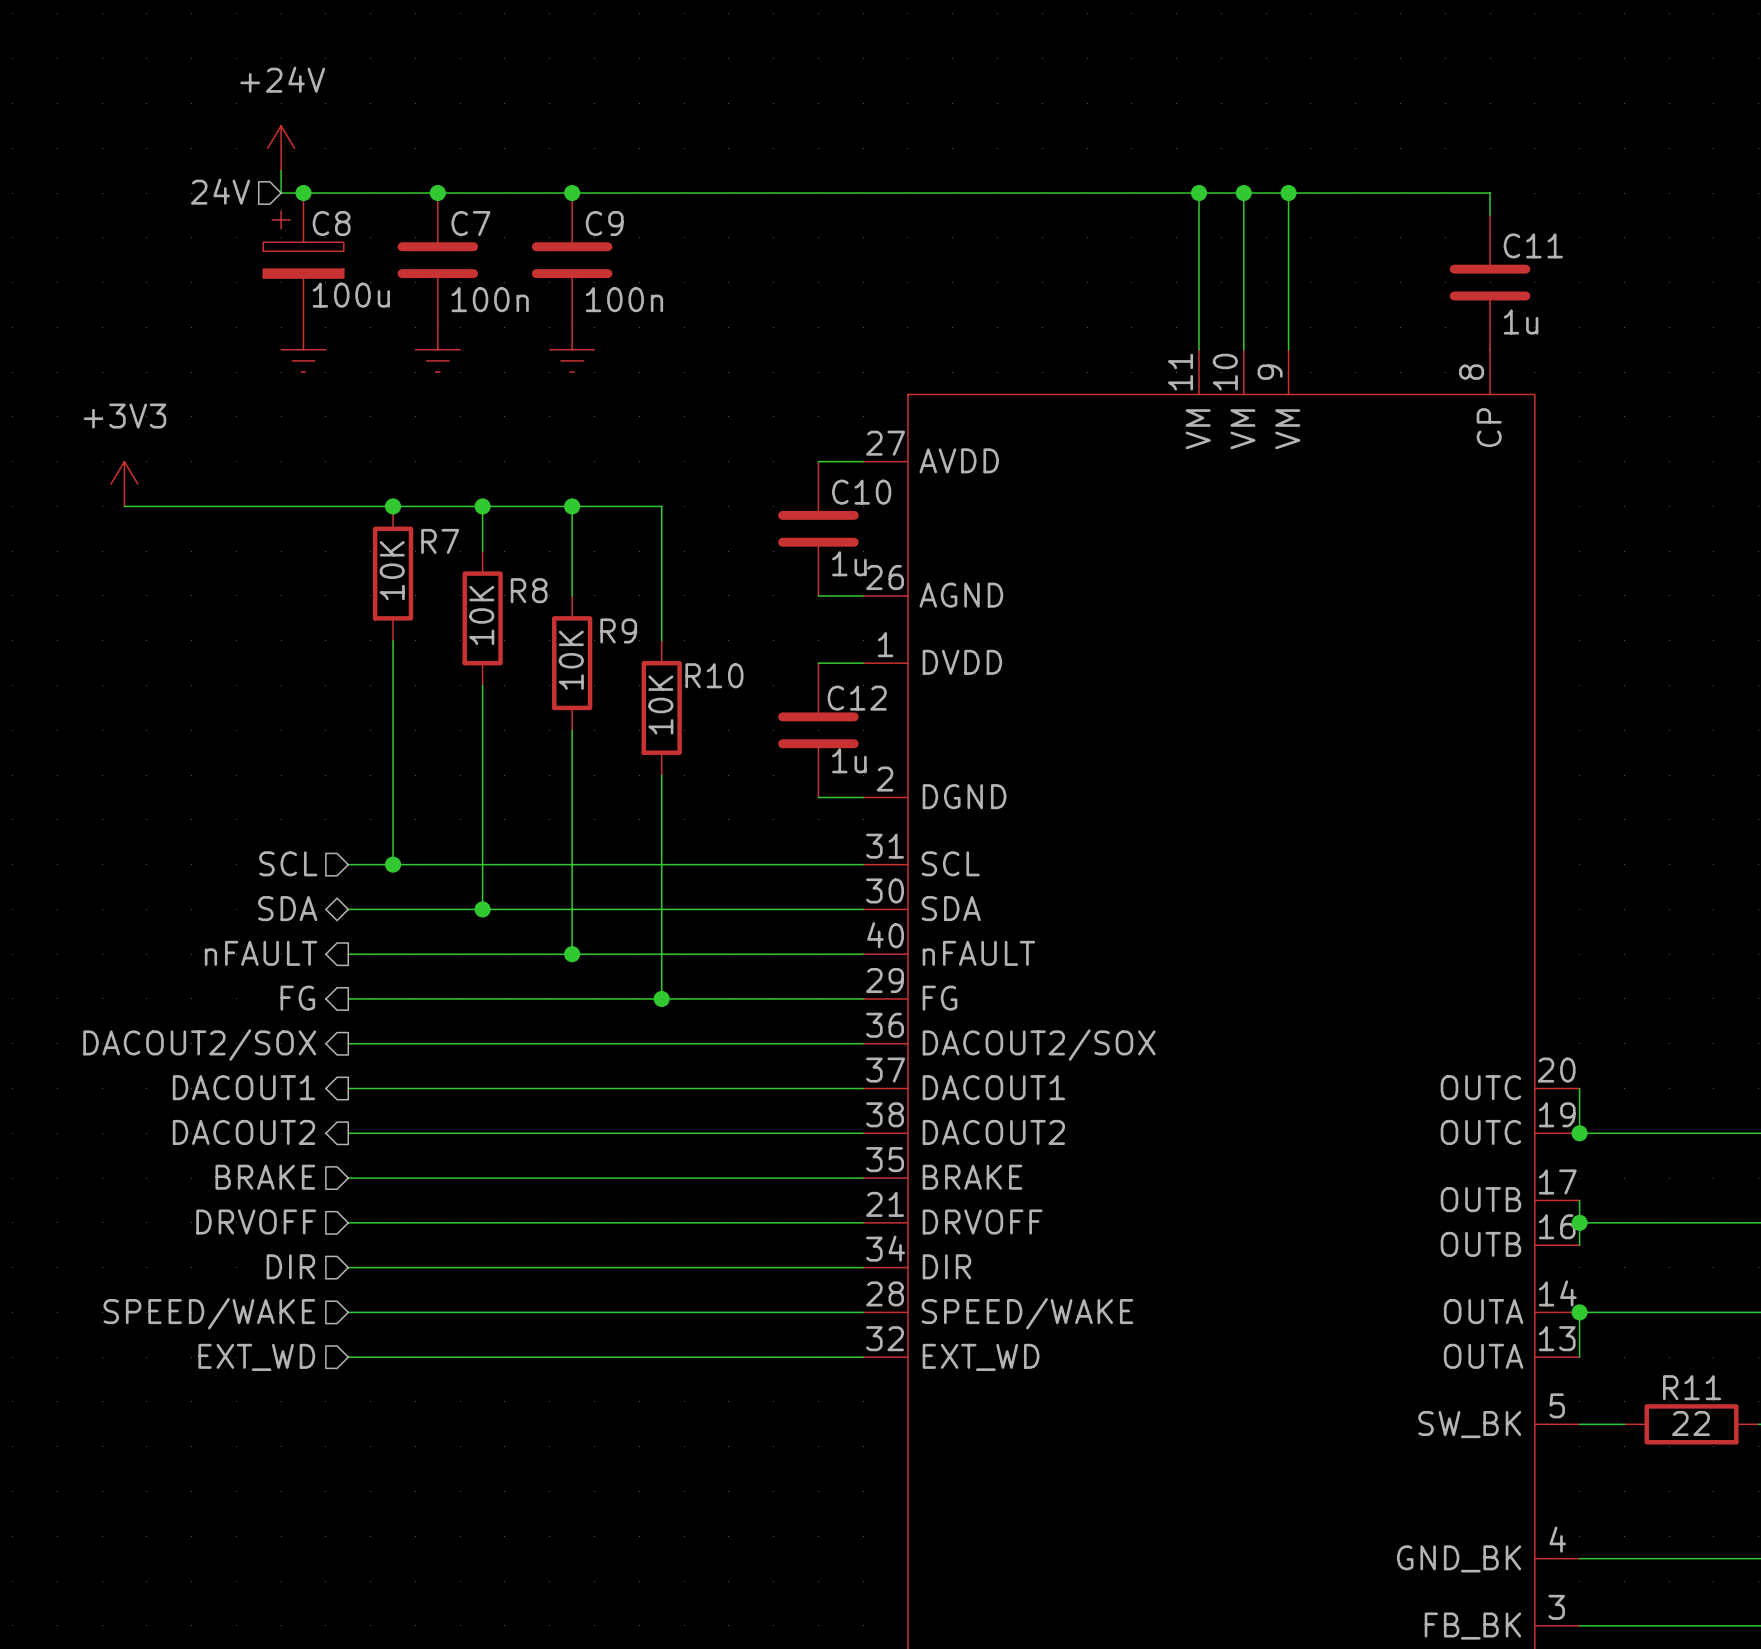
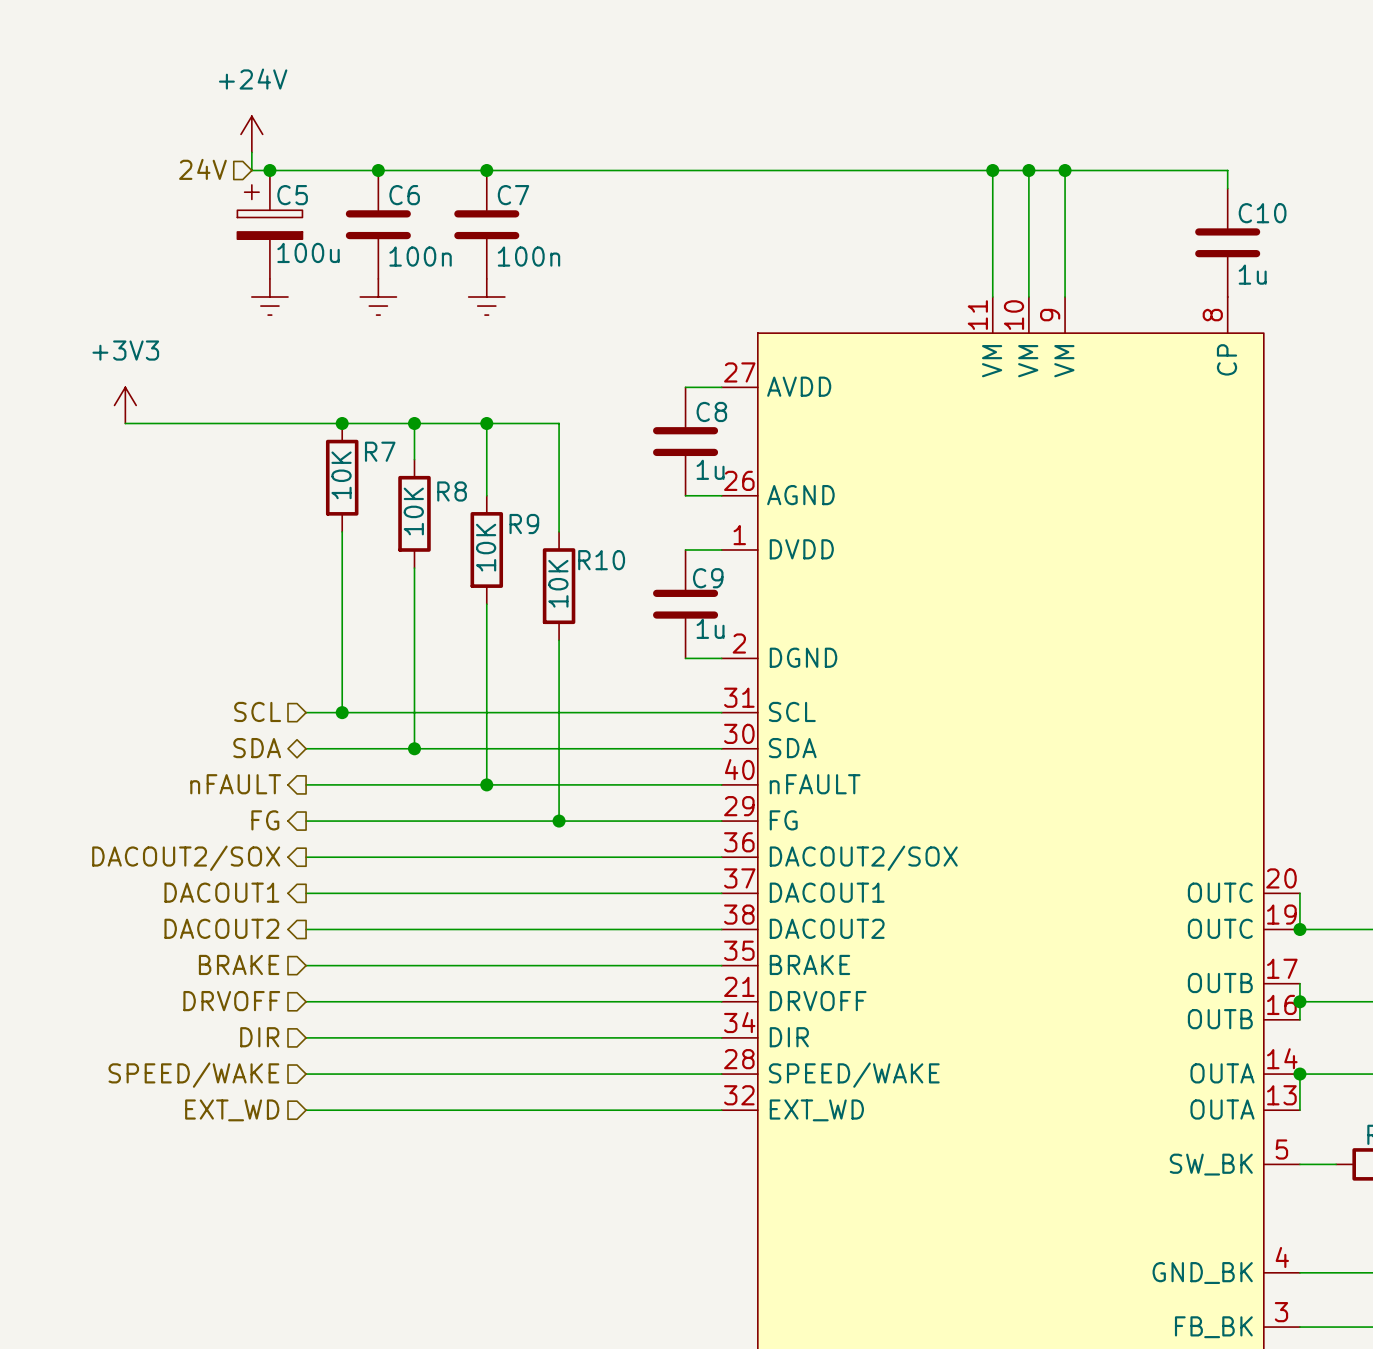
C8 name: C8 (331, 223) -> C5 (292, 195)
C7 name: C7 (470, 223) -> C6 (404, 195)
C9 name: C9 (604, 223) -> C7 (513, 195)
C11 name: C11 (1533, 245) -> C10 (1262, 213)
C10 name: C10 (861, 492) -> C8 (711, 411)
C12 name: C12 (857, 698) -> C9 (708, 578)

